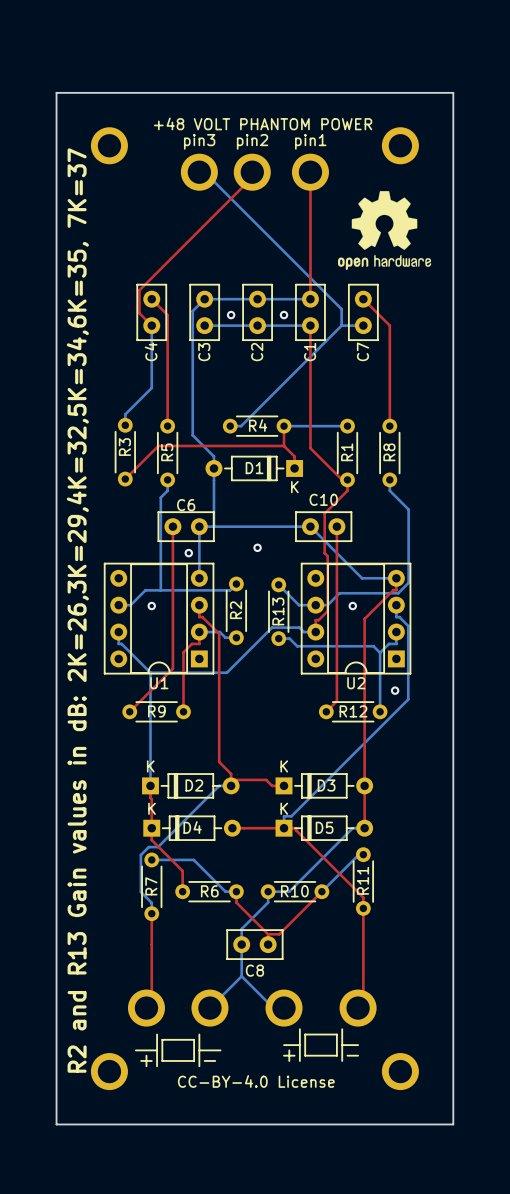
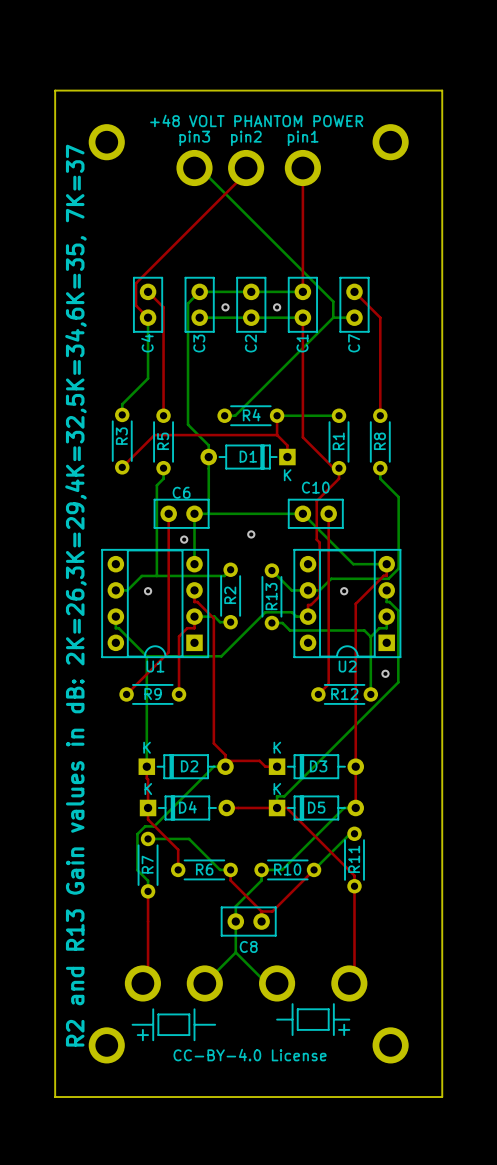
drawing: [337, 191, 432, 270] -> none
line: (289, 1050) (289, 1060) -> (344, 1024) (344, 1035)
line: (284, 1055) (294, 1055) -> none
line: (204, 1060) (215, 1060) -> none

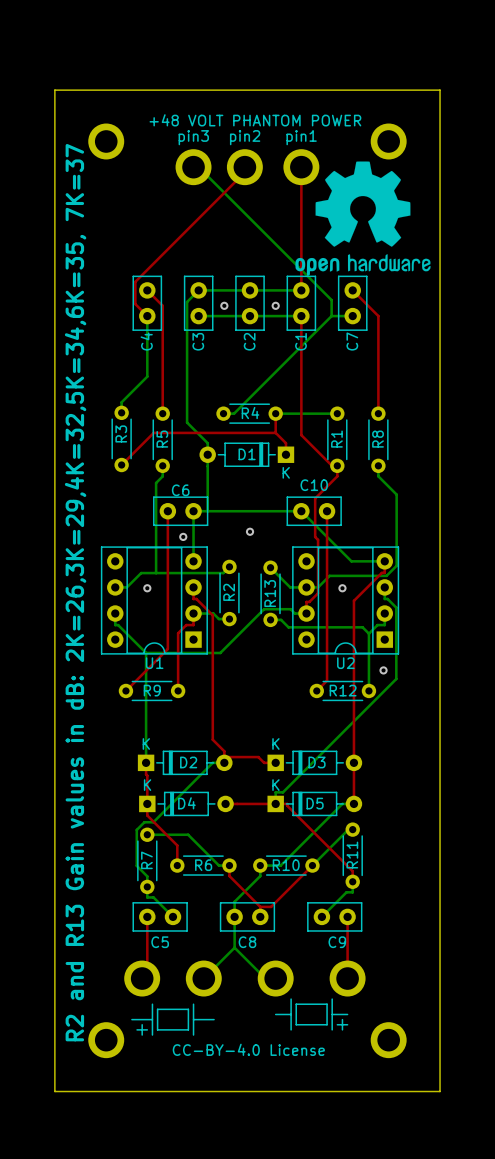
drawing: none -> [295, 161, 431, 276]
top track: (354, 886) (354, 978) (349, 983) -> (347, 916) (347, 978)
bottom track: none -> (352, 881) (352, 892) (346, 892) (321, 916)
top track: (148, 891) (148, 921) -> none
bottom track: none -> (147, 886) (147, 897) (153, 897) (172, 916)
C5: none -> (160, 916)
C9: none -> (334, 916)

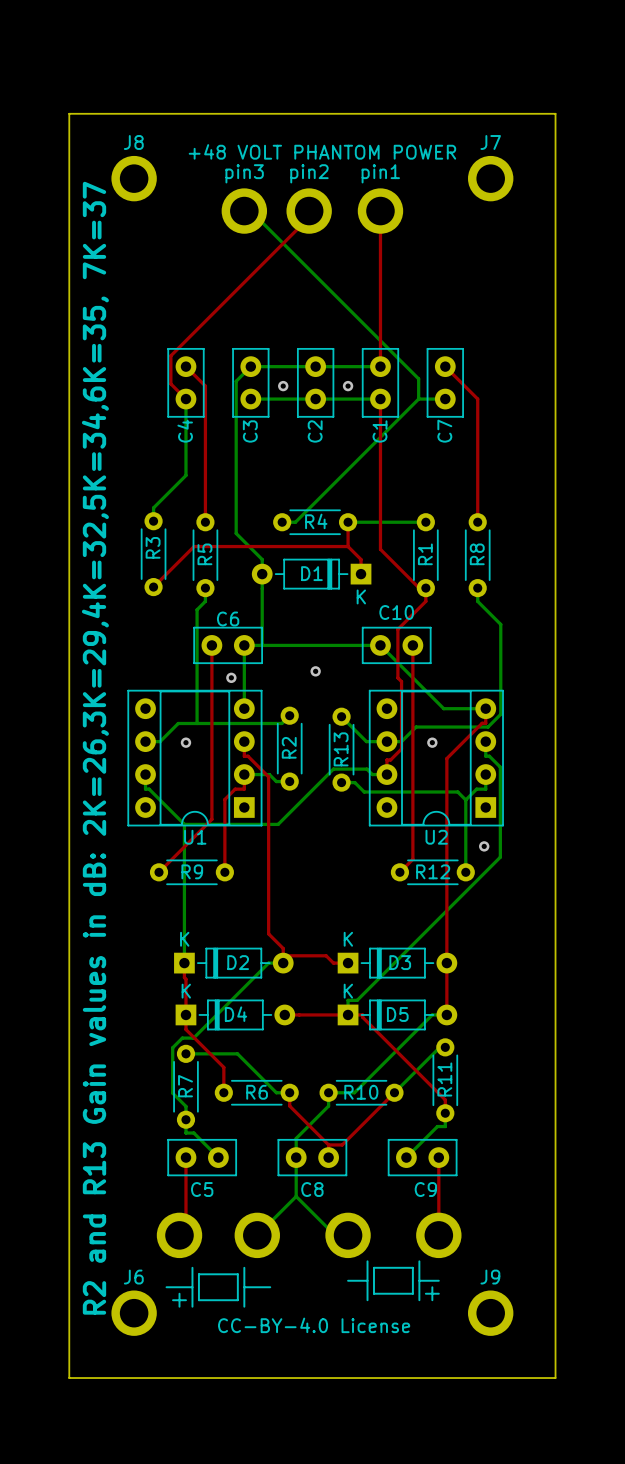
J8 name: none -> J8 (133, 142)
J7 name: none -> J7 (490, 142)
drawing: [295, 161, 431, 276] -> none
J6 name: none -> J6 (133, 1277)
J9 name: none -> J9 (490, 1277)

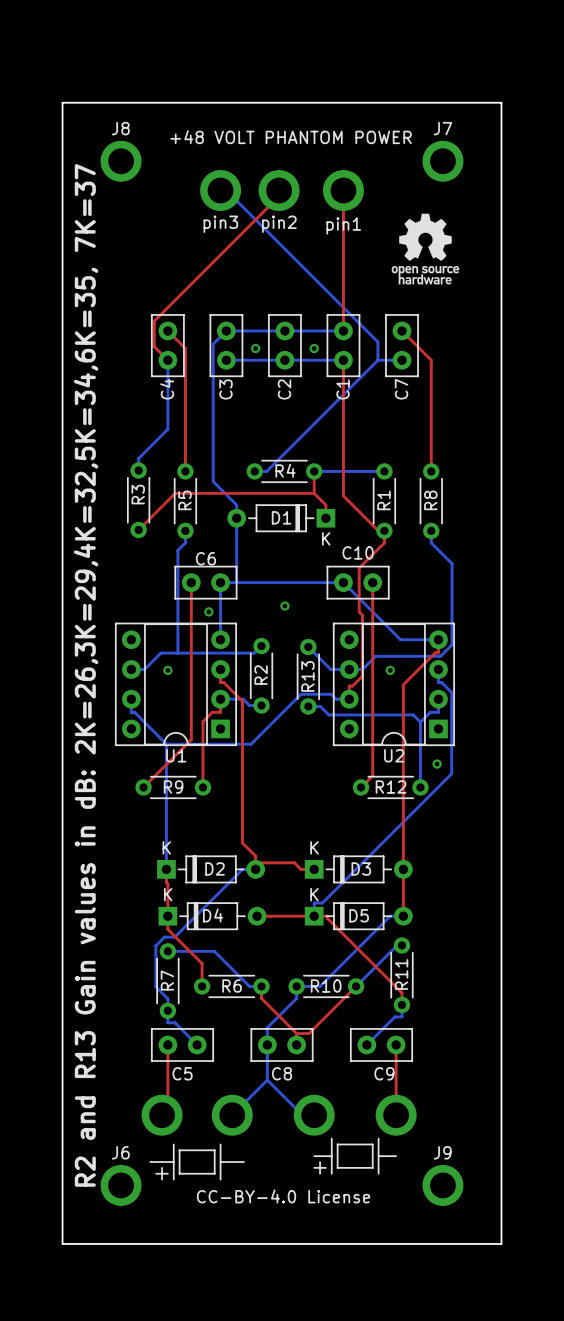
text: pin3 (244, 173) -> none
text: pin2 (309, 173) -> none
text: pin1 (380, 173) -> none
drawing: none -> [391, 213, 460, 285]
part value: none -> pin3 (220, 224)
part value: none -> pin2 (279, 224)
part value: none -> pin1 (343, 225)
line: (432, 1287) (432, 1300) -> (320, 1162) (320, 1173)
line: (425, 1293) (438, 1293) -> (314, 1167) (325, 1167)

